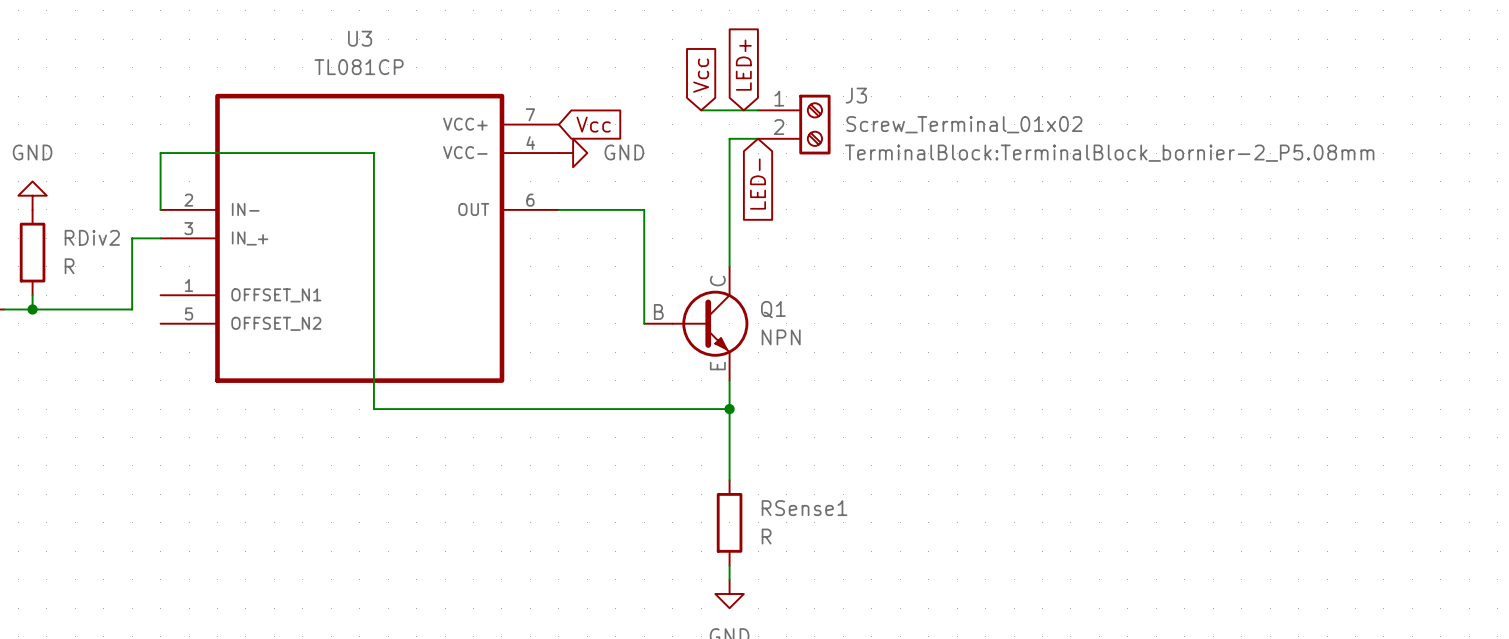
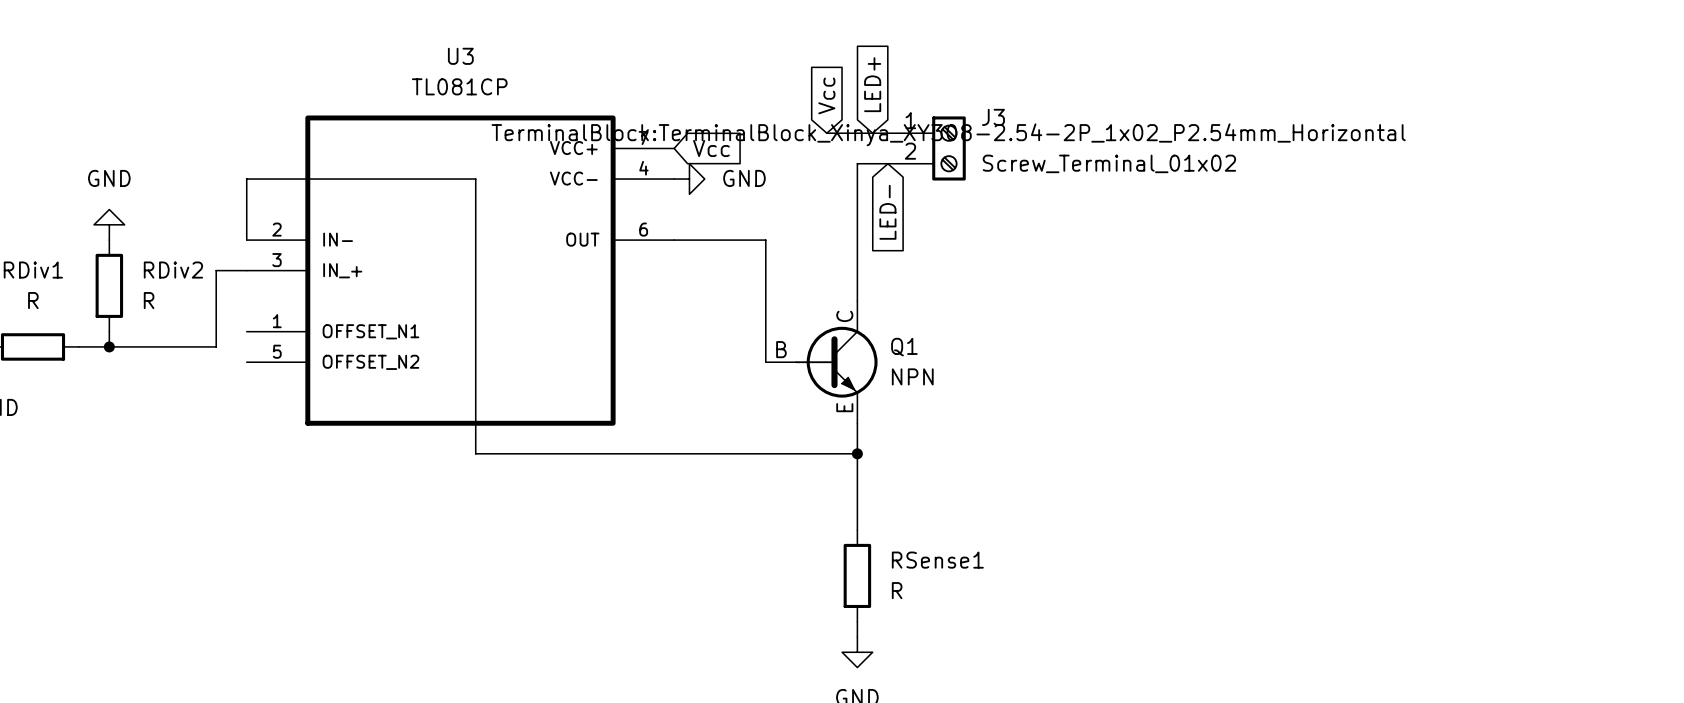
J3 value position: Screw_Terminal_01x02 (964, 124) -> Screw_Terminal_01x02 (1109, 163)
J3 text: TerminalBlock:TerminalBlock_bornier-2_P5.08mm (1109, 153) -> TerminalBlock:TerminalBlock_Xinya_XY308-2.54-2P_1x02_P2.54mm_Horizontal (948, 134)

